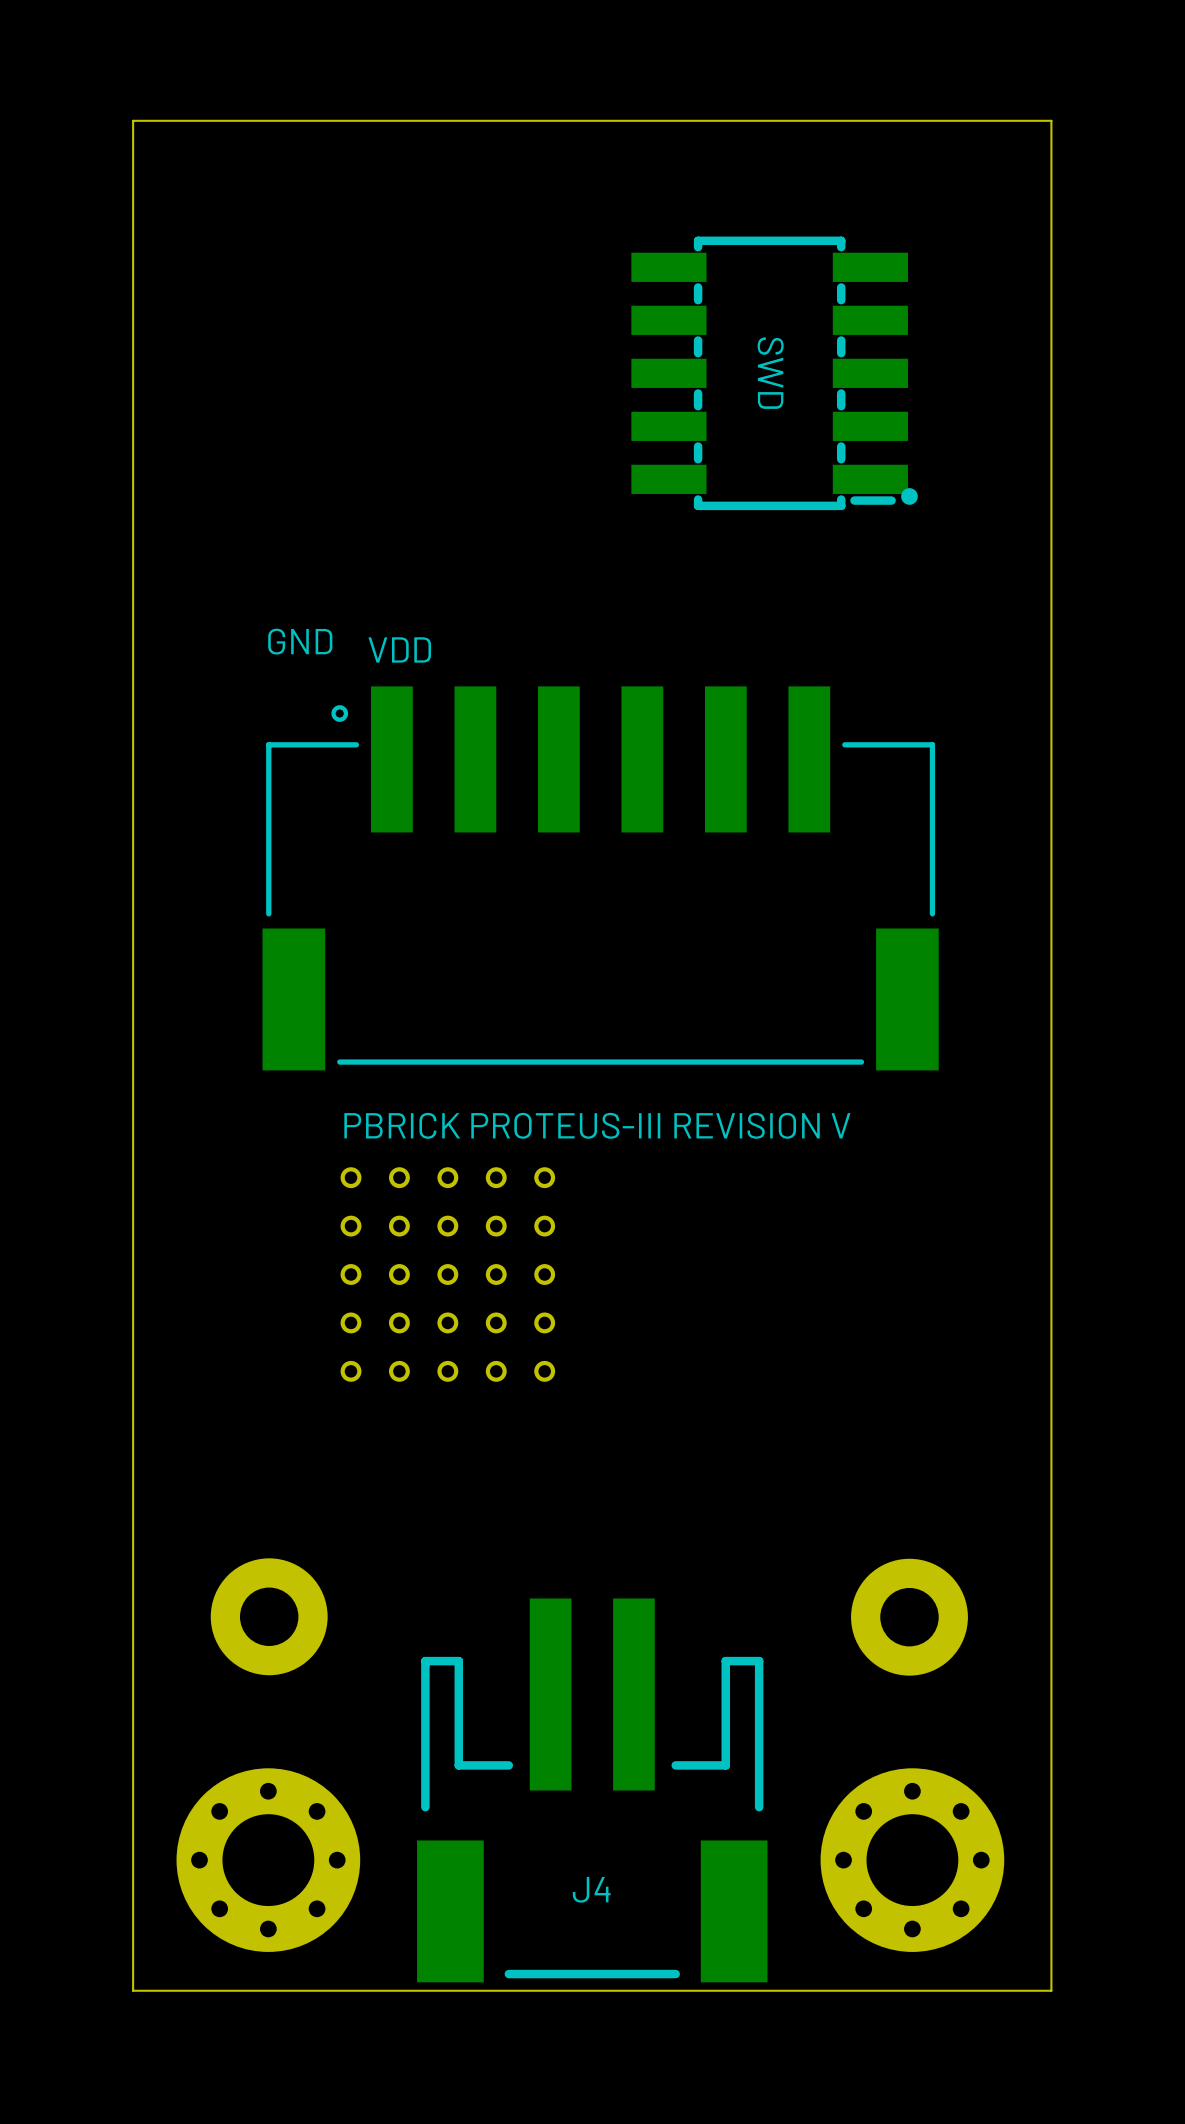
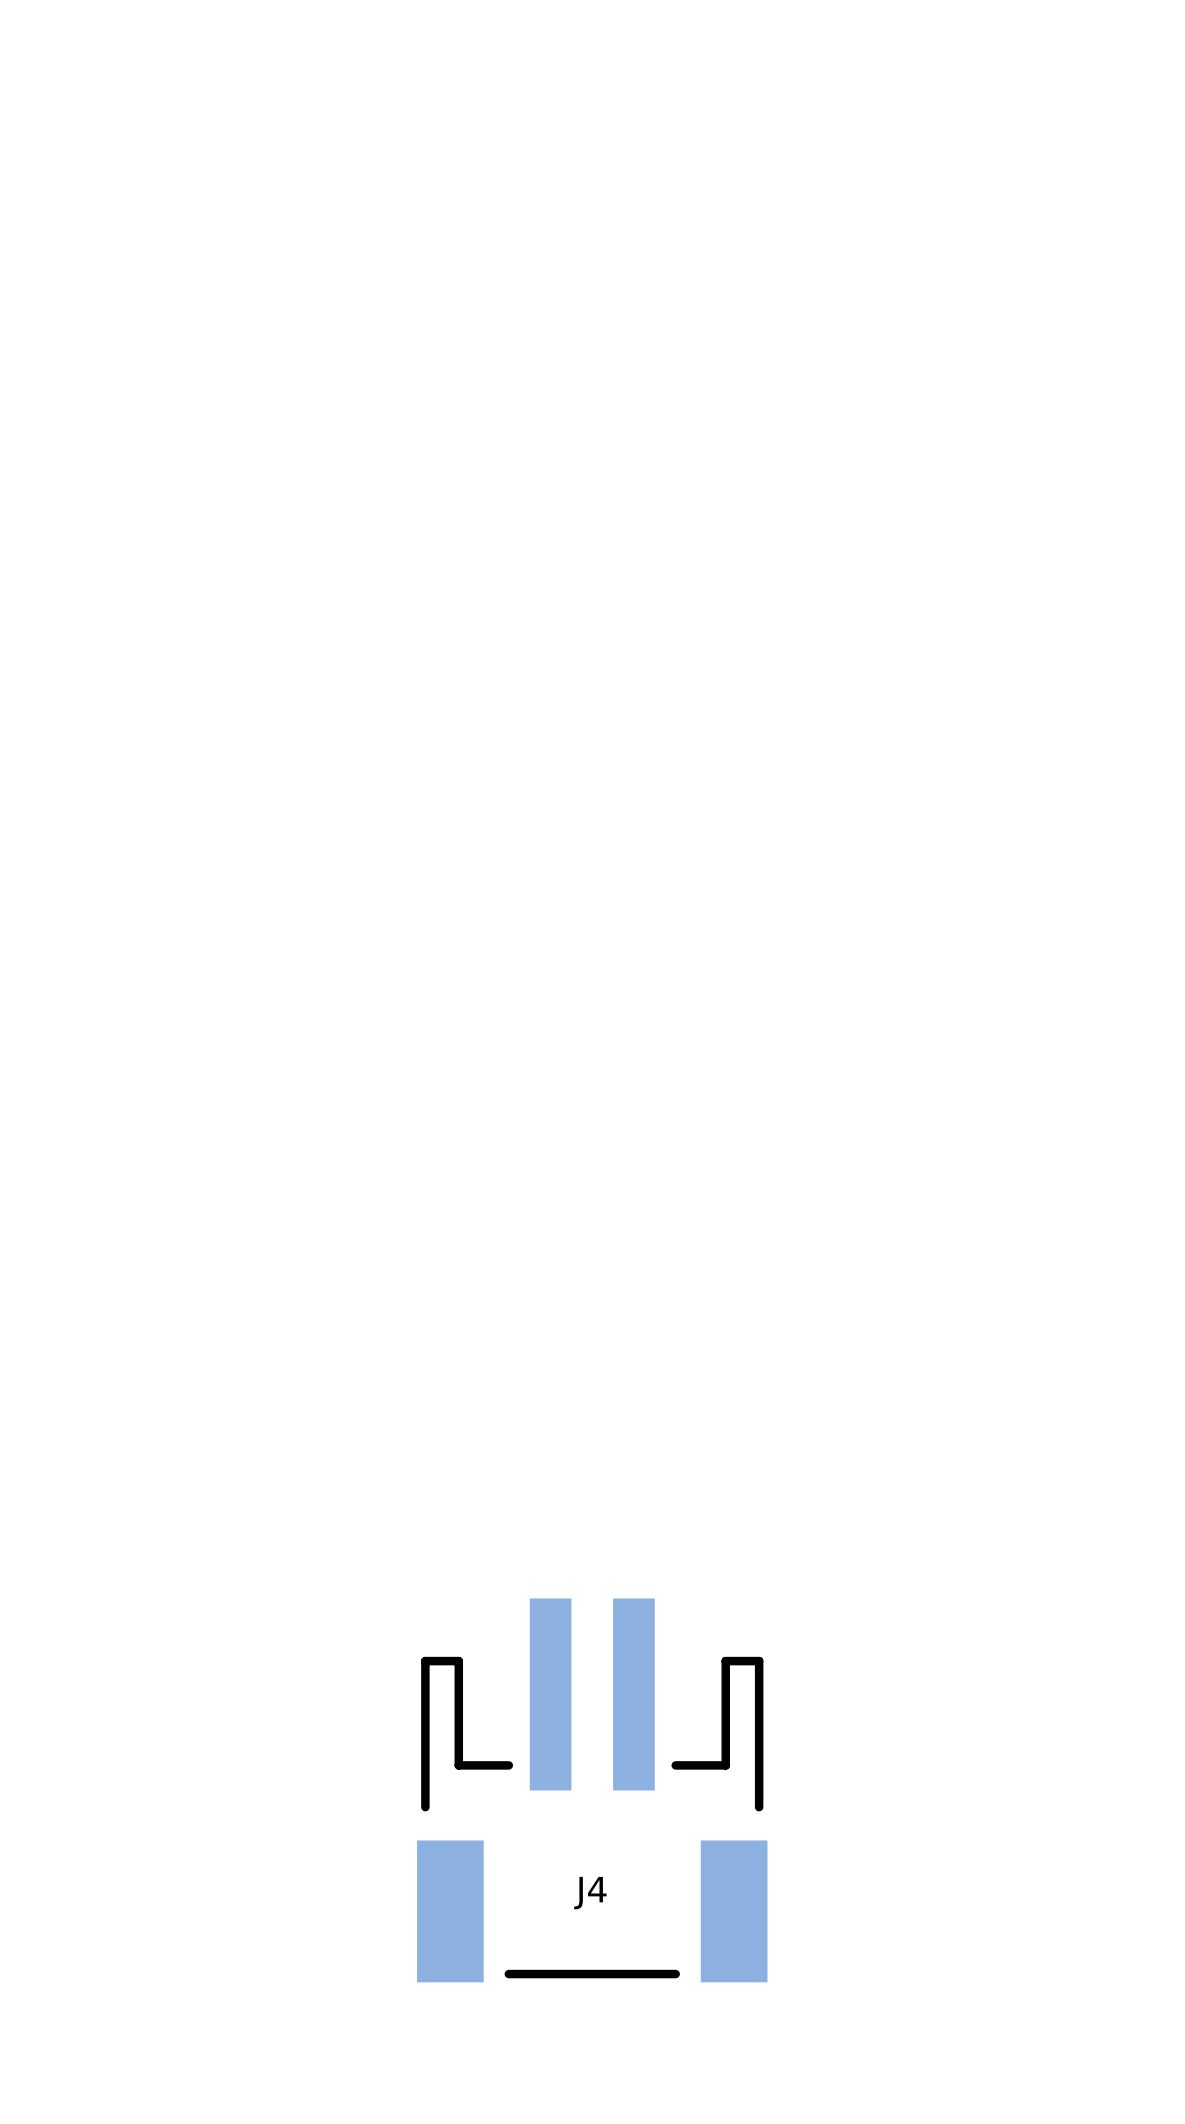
board edge: (1051, 120) (1051, 1990) (133, 1990) (133, 120) (1051, 120) -> none
part: SWD (769, 373) -> none
drawing: [901, 488, 918, 505] -> none
text: GND (300, 641) -> none
text: VDD (399, 649) -> none
part: (600, 878) -> none
text: PBRICK PROTEUS-III REVISION V (597, 1125) -> none
part: (447, 1274) -> none
part: (269, 1616) -> none
part: (909, 1617) -> none
part: (268, 1860) -> none
part: (912, 1860) -> none

